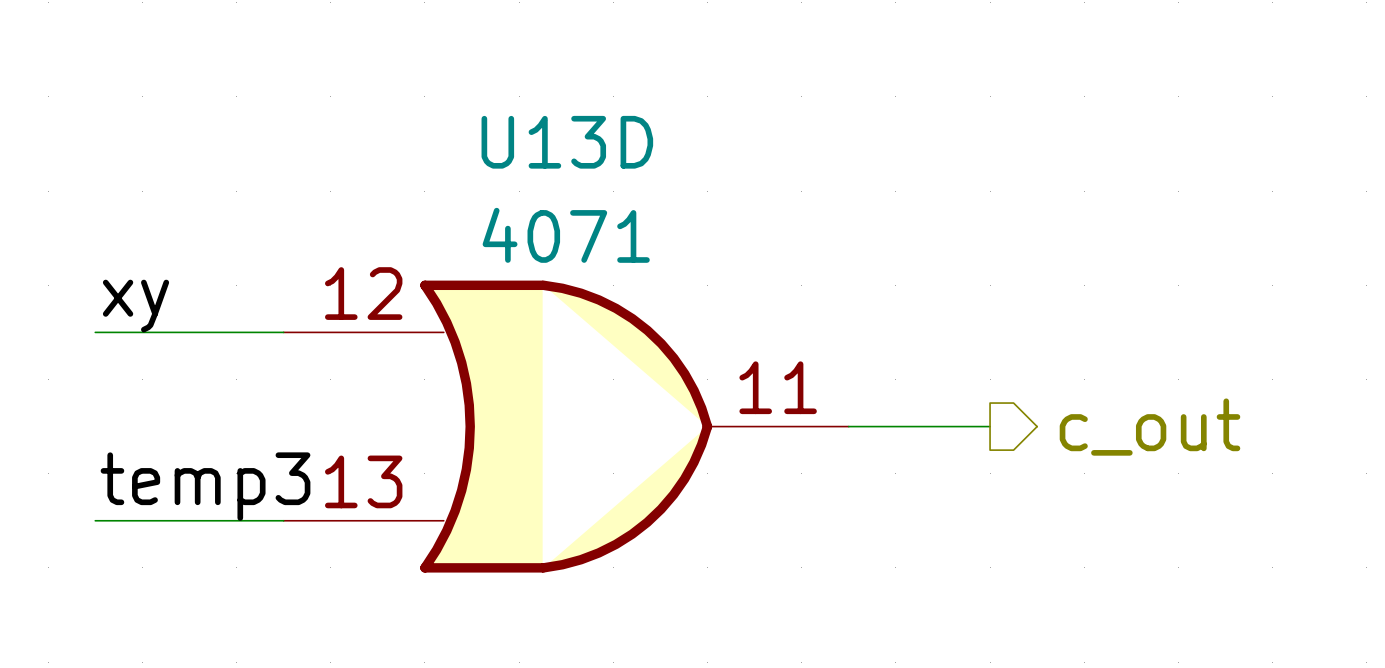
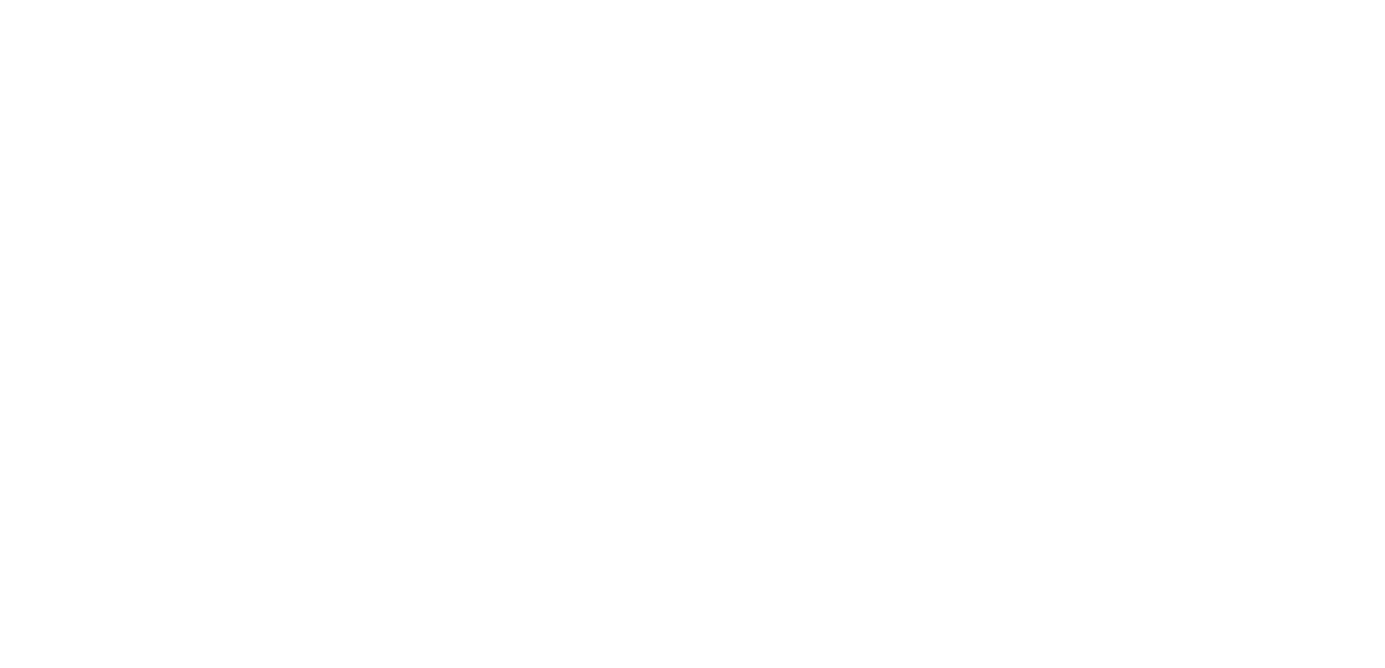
label: xy (136, 306) -> none
wire: (95, 332) (283, 332) -> none
U13D: 4071 (566, 426) -> none
wire: (848, 426) (990, 426) -> none
hierarchical label: c_out (1150, 427) -> none
label: temp3 (205, 486) -> none
wire: (95, 520) (283, 520) -> none

